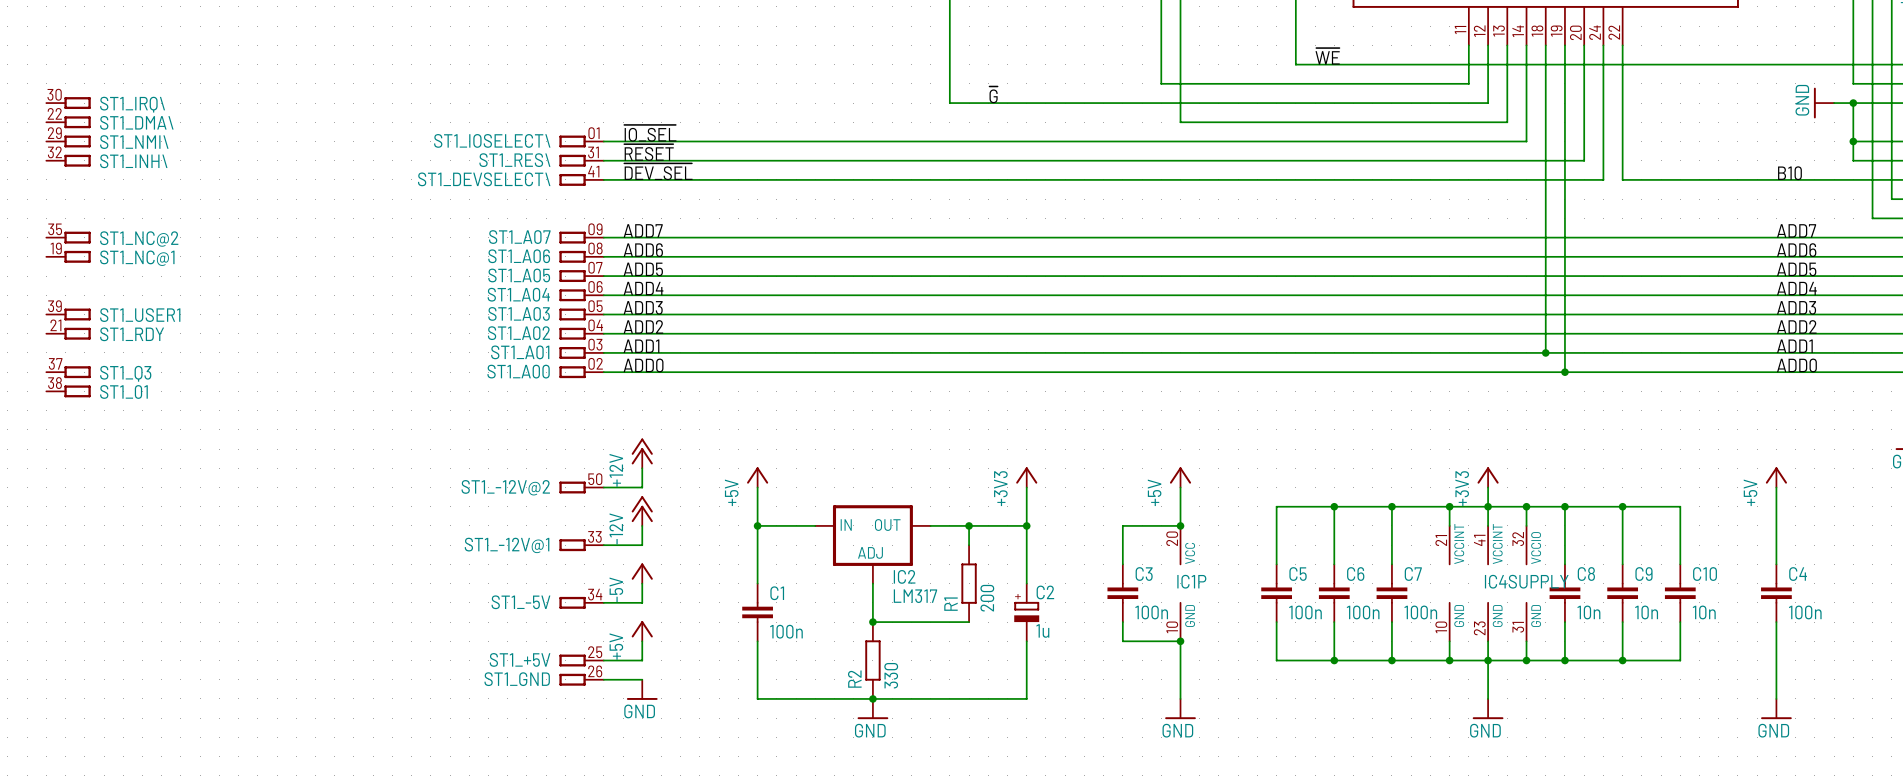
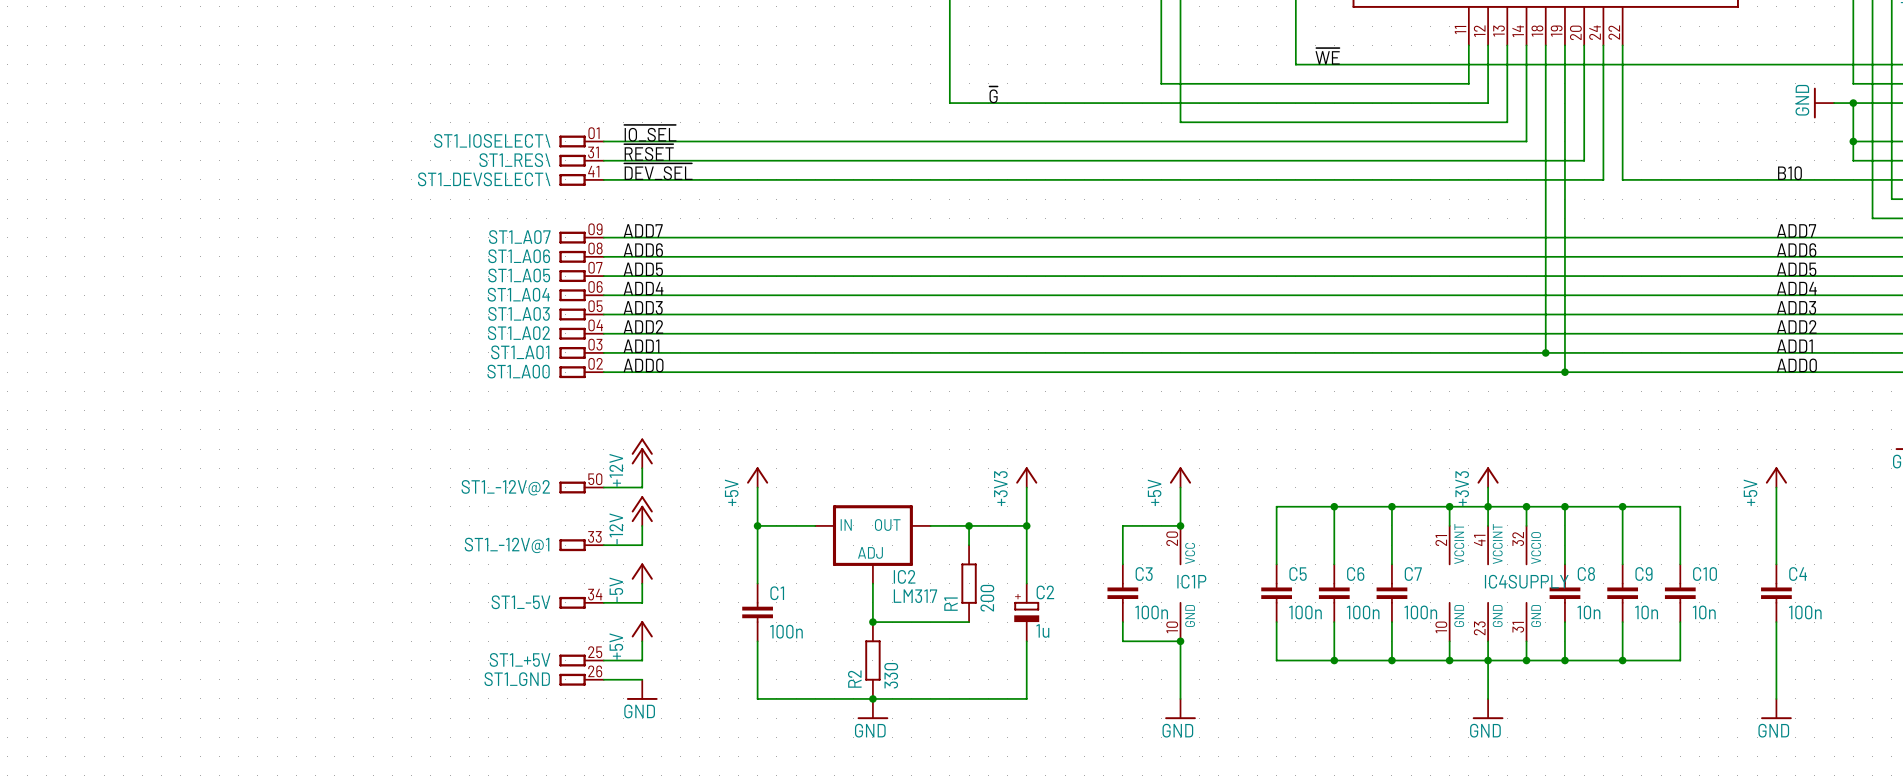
ST1_IRQ\: (68, 103) -> none
ST1_DMA\: (68, 122) -> none
ST1_NMI\: (68, 141) -> none
ST1_INH\: (68, 160) -> none
ST1_NC@2: (68, 237) -> none
ST1_NC@1: (68, 256) -> none
ST1_USER1: (68, 314) -> none
ST1_RDY: (68, 333) -> none
ST1_Q3: (68, 372) -> none
ST1_01: (68, 391) -> none

